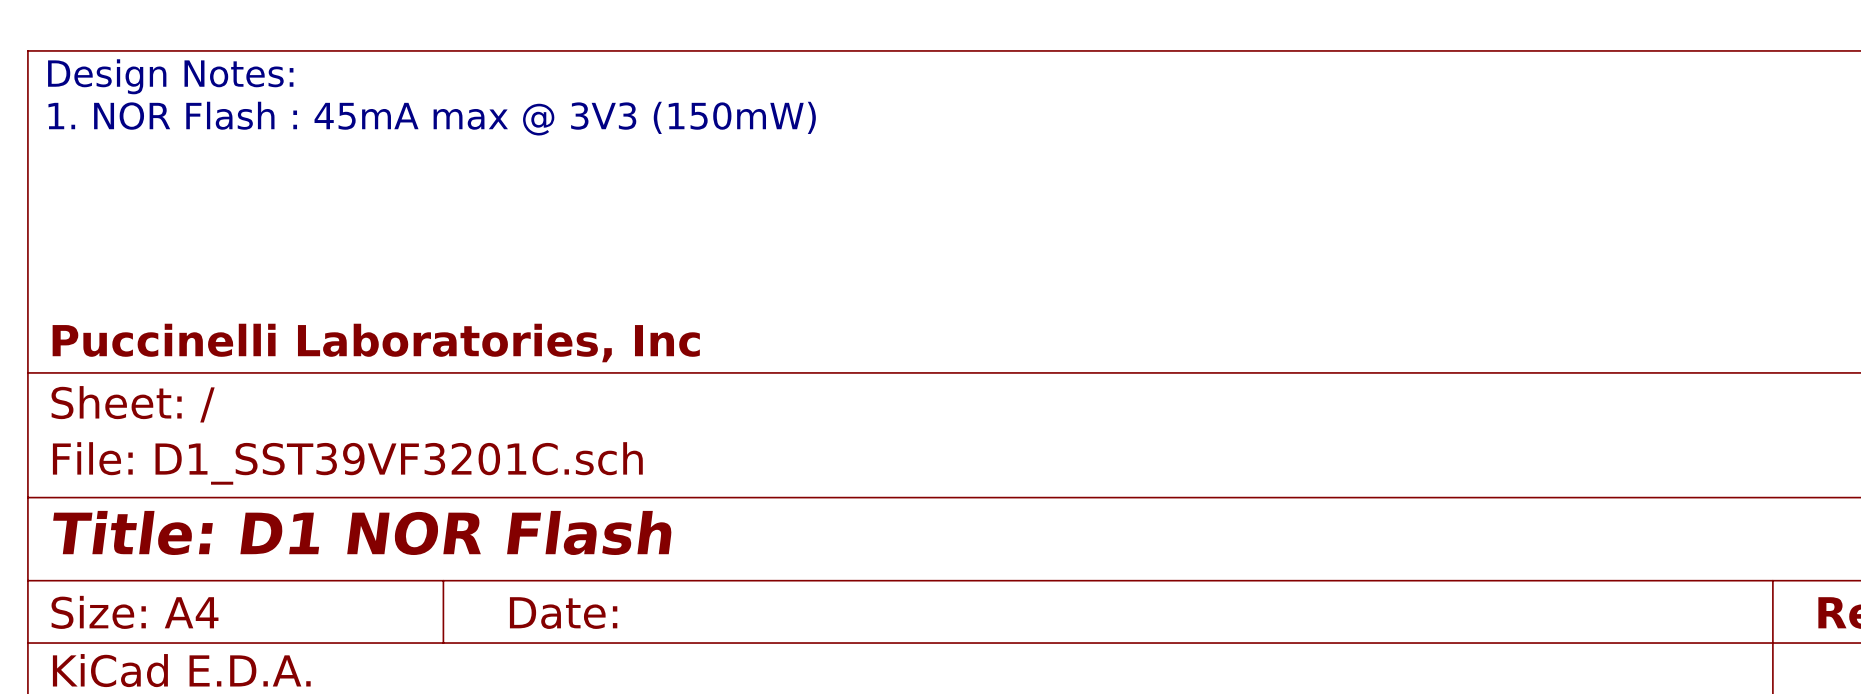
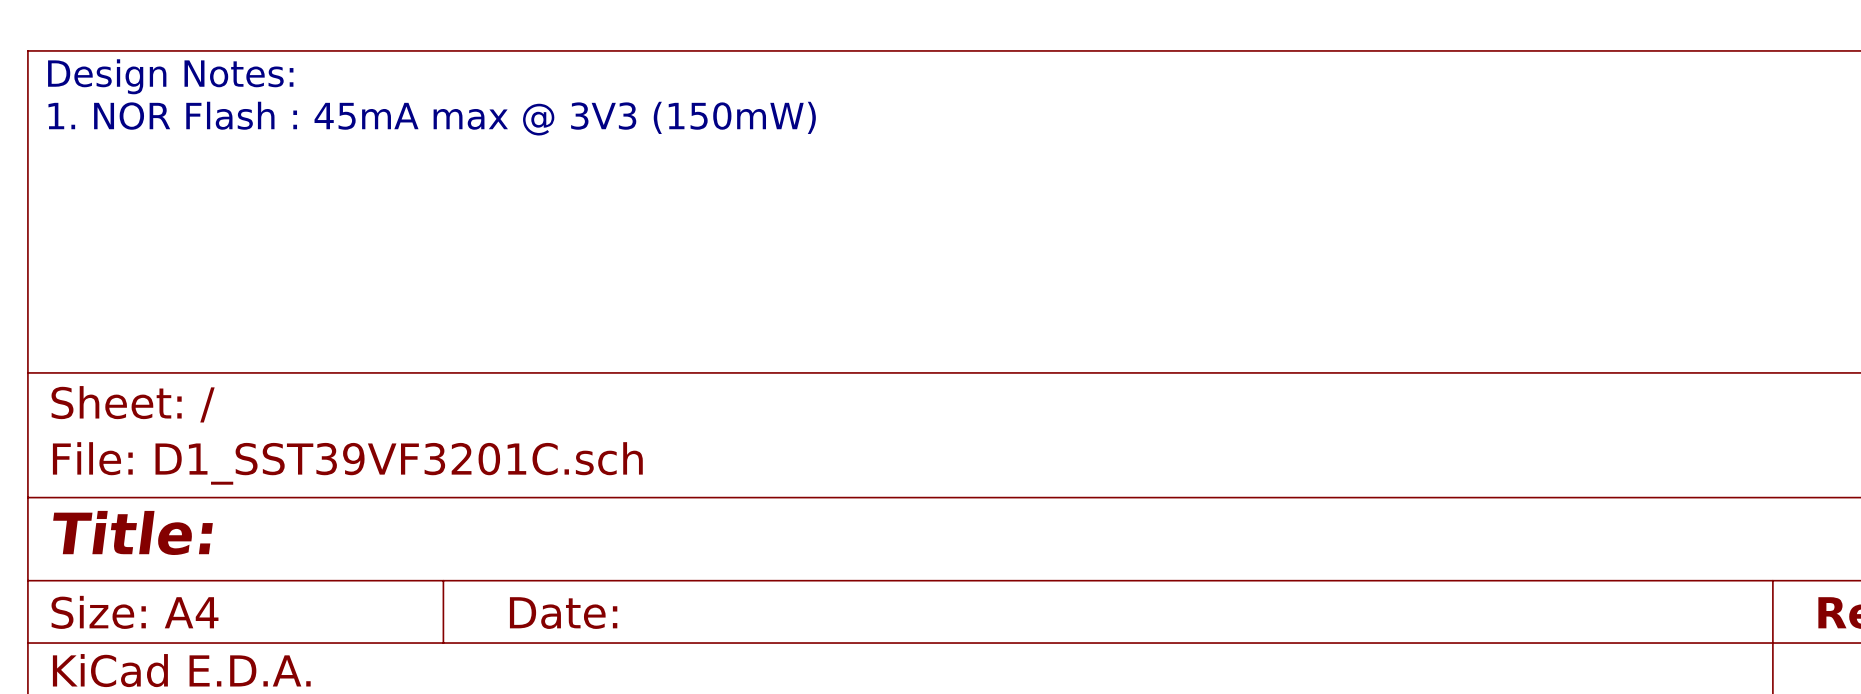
title block: Puccinelli Laboratories, Inc (376, 343) -> none
title block: Title: D1 NOR Flash (362, 532) -> Title: (133, 532)

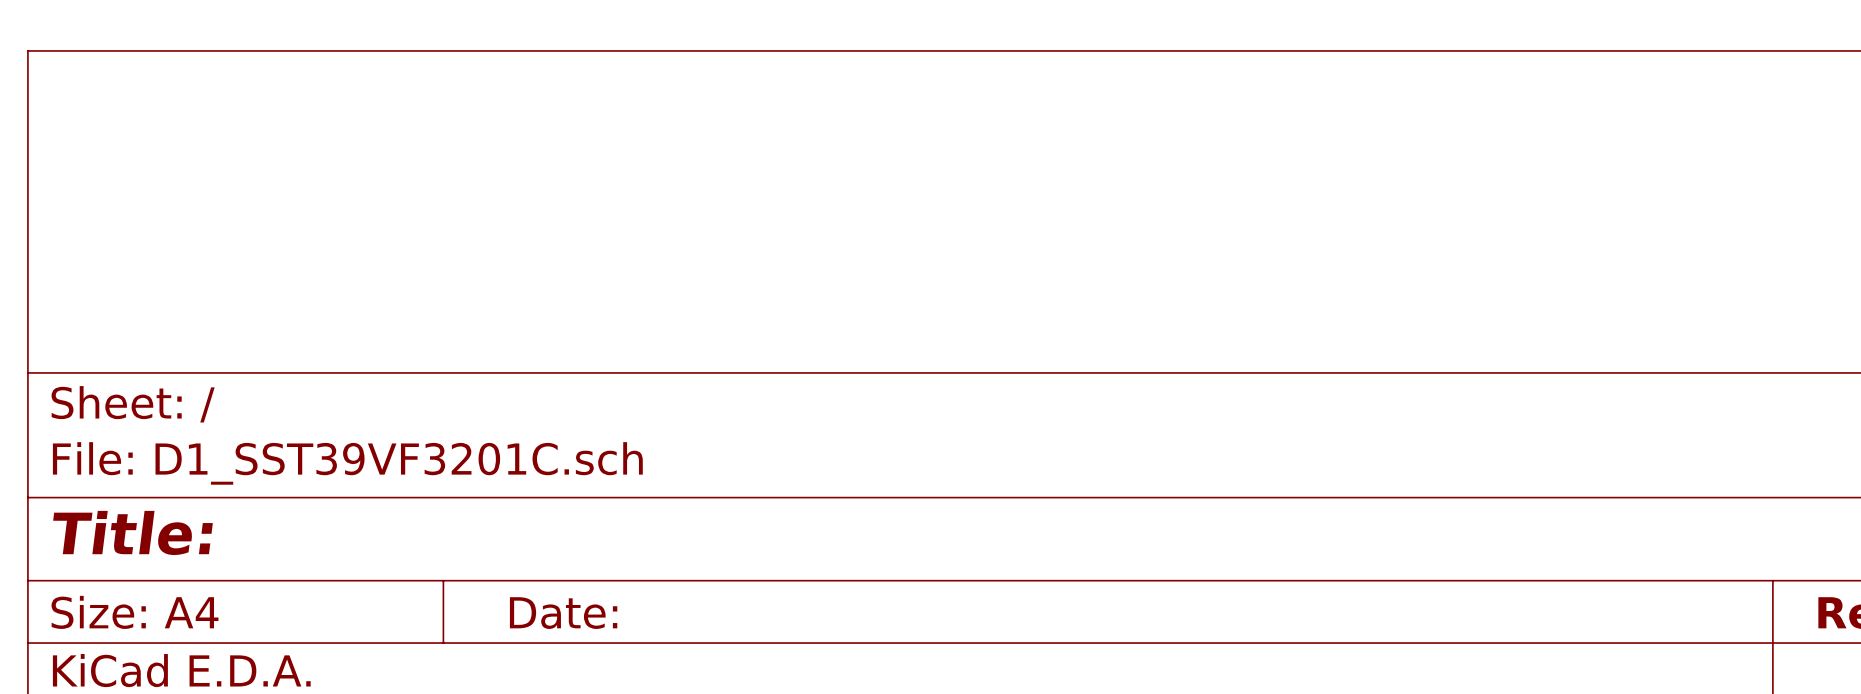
text: Design Notes: (170, 76) -> none
text: 1. NOR Flash : 45mA max @ 3V3 (150mW) (432, 118) -> none

